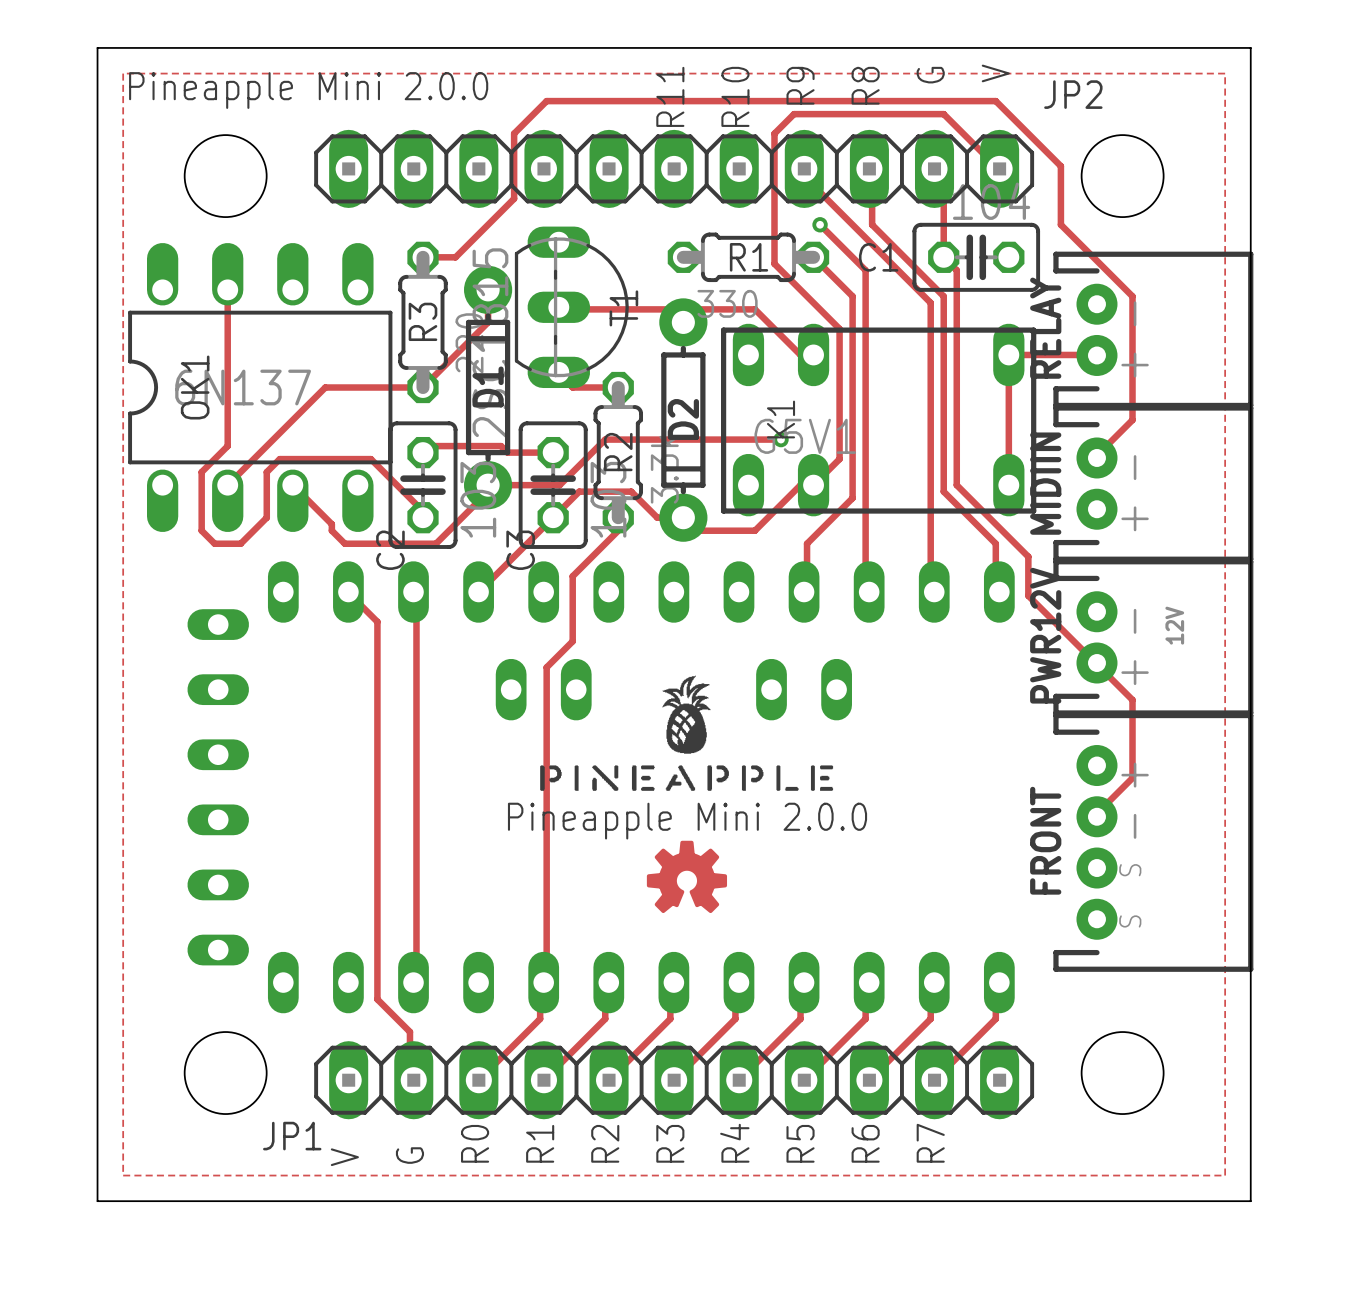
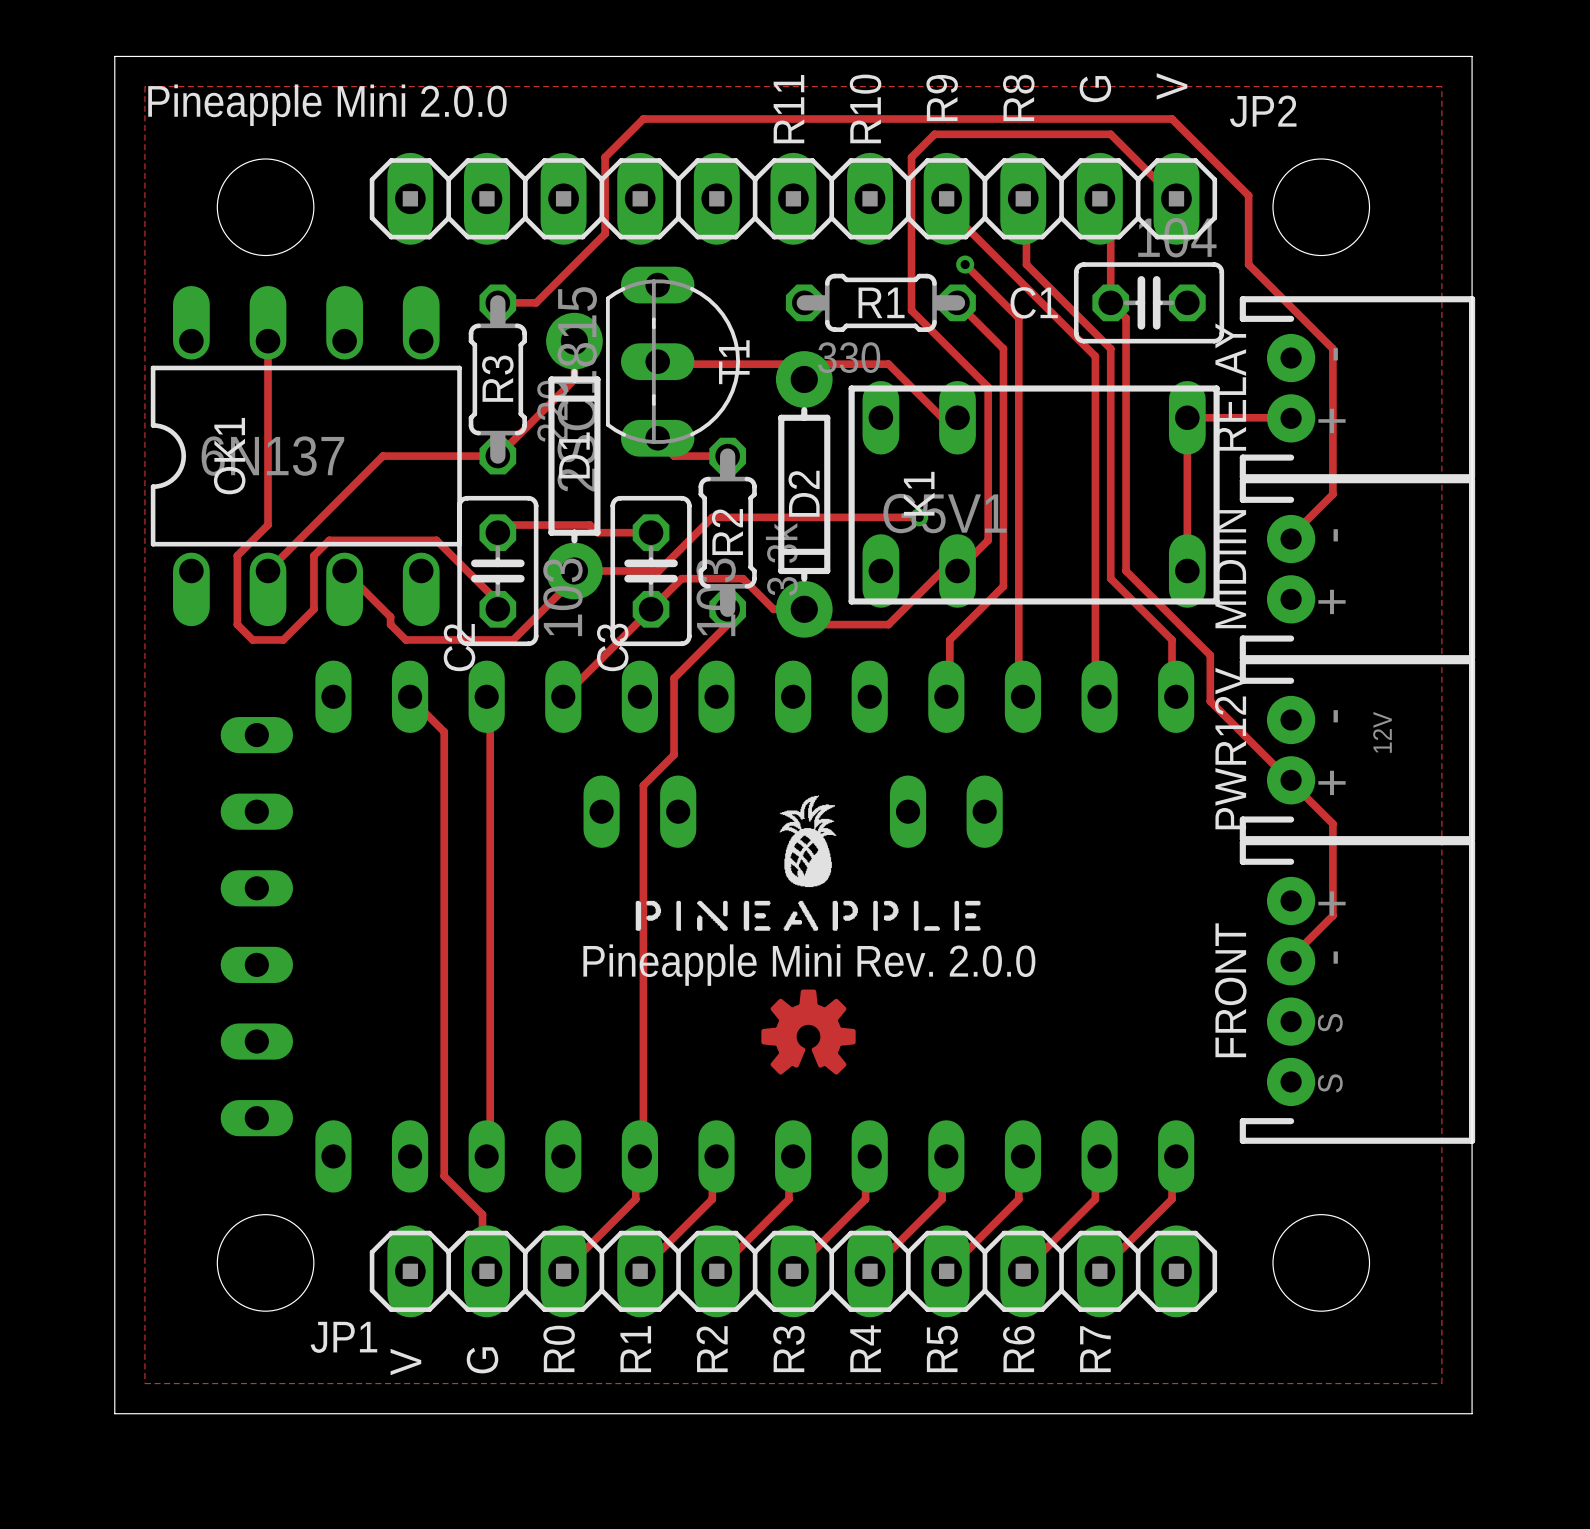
text: Pineapple Mini 2.0.0 (687, 821) -> Pineapple Mini Rev. 2.0.0 (809, 965)

